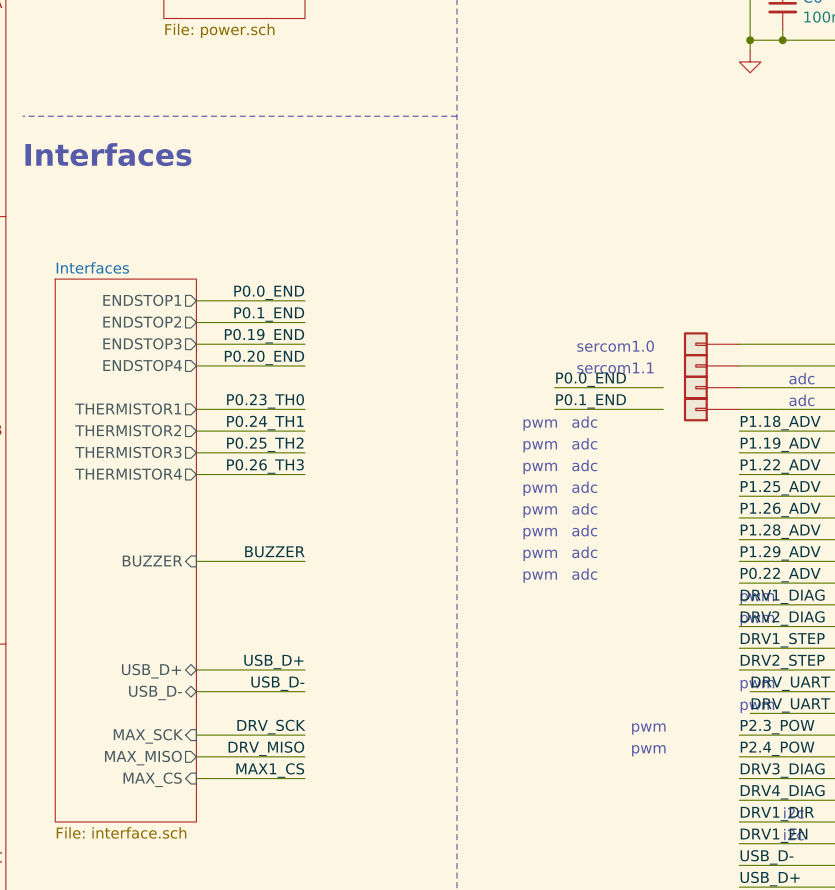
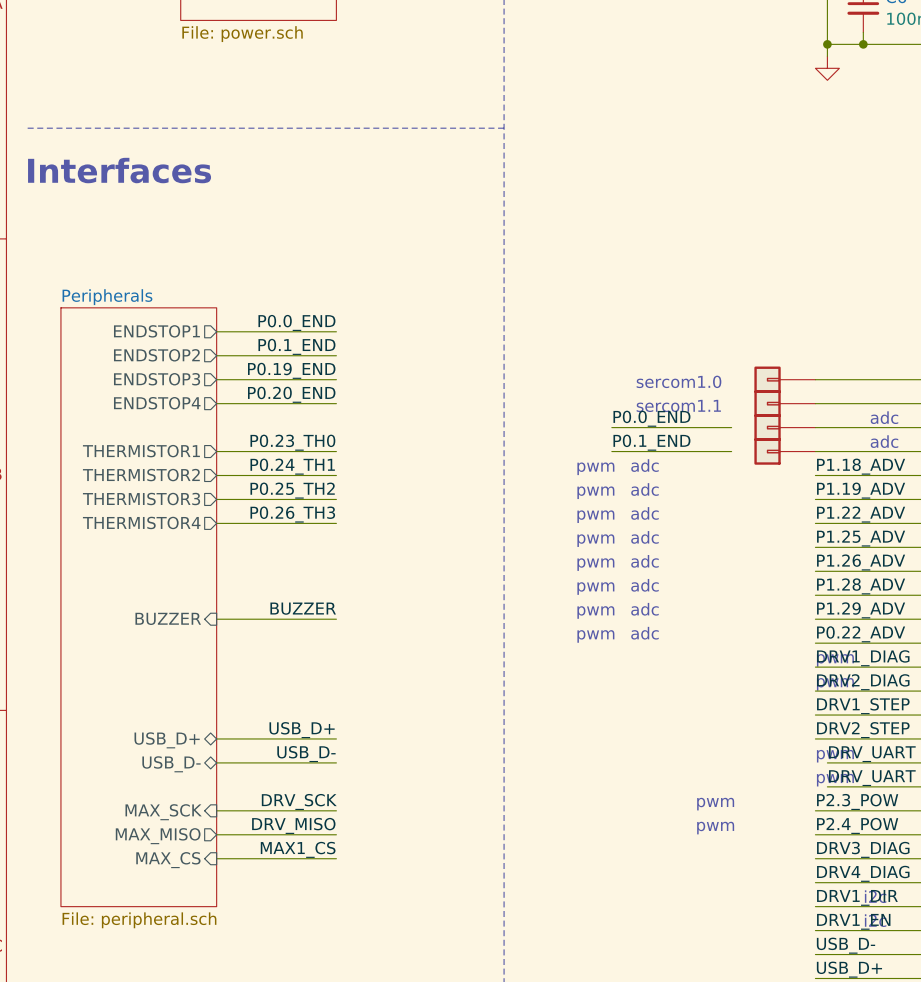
sheet Interfaces name: Interfaces (92, 267) -> Peripherals (107, 297)
sheet Interfaces value: File: interface.sch (121, 832) -> File: peripheral.sch (139, 920)

